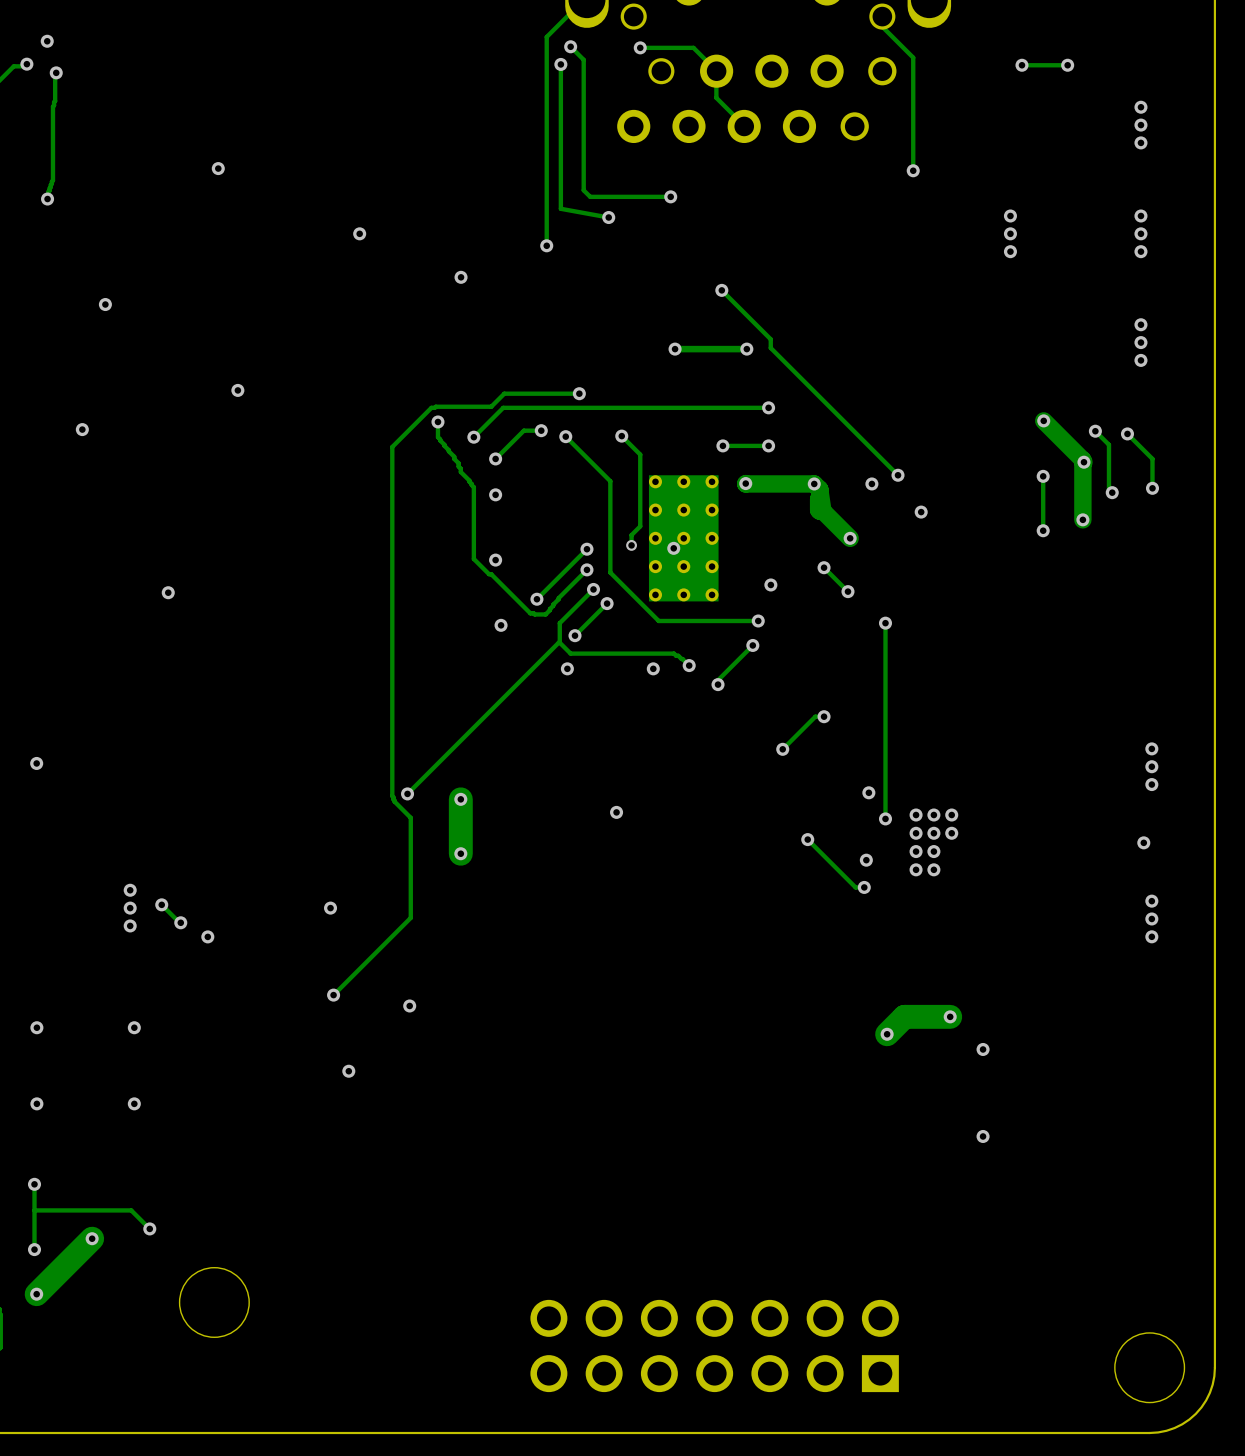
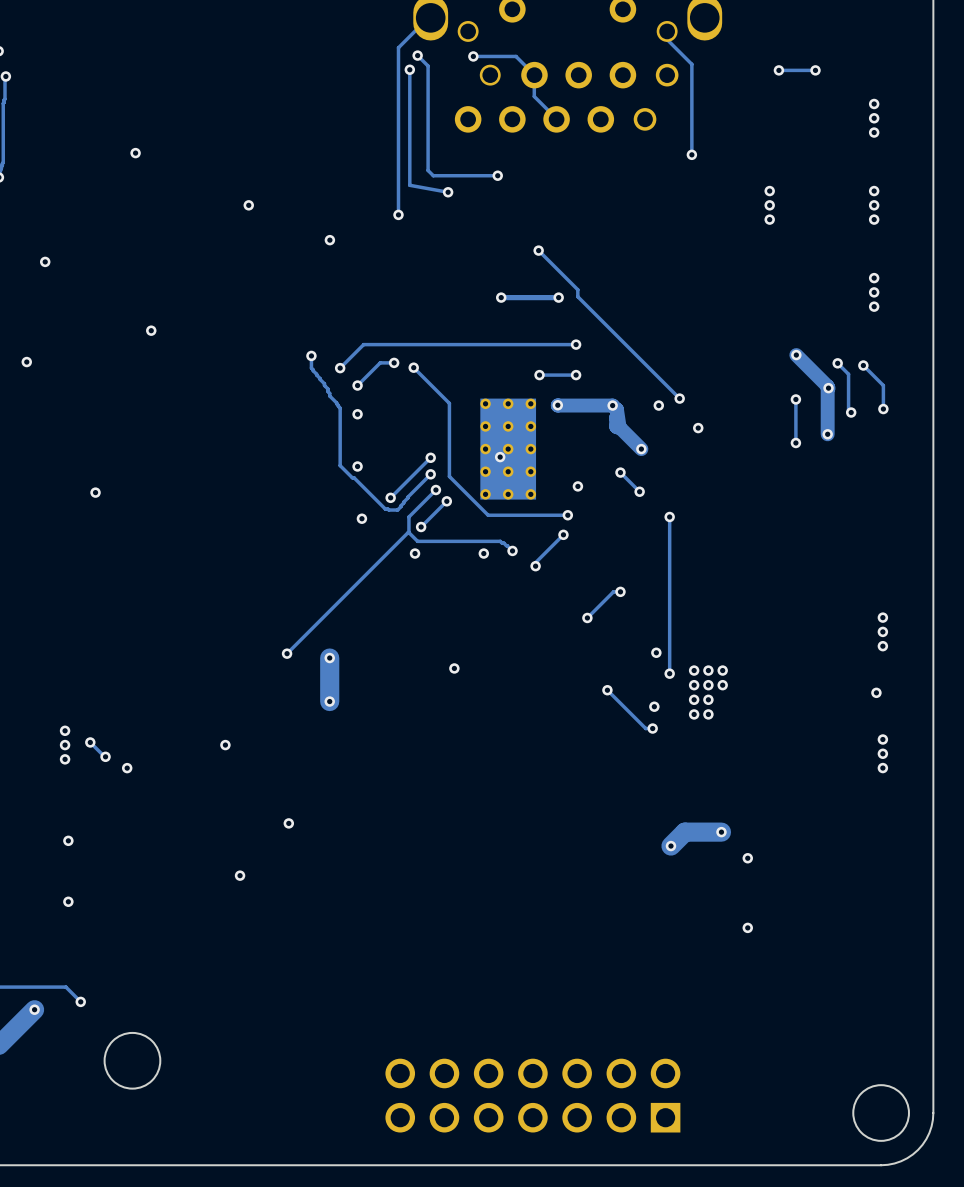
track: (579, 393) (504, 393) (491, 406) (431, 407) (392, 446) (392, 796) (394, 801) (410, 817) (410, 917) (333, 995) -> none
via: (579, 393) -> none
track: (621, 436) (640, 454) (640, 526) (631, 535) (631, 544) -> none
via: (621, 436) -> none
via: (631, 545) -> none
via: (333, 995) -> none

